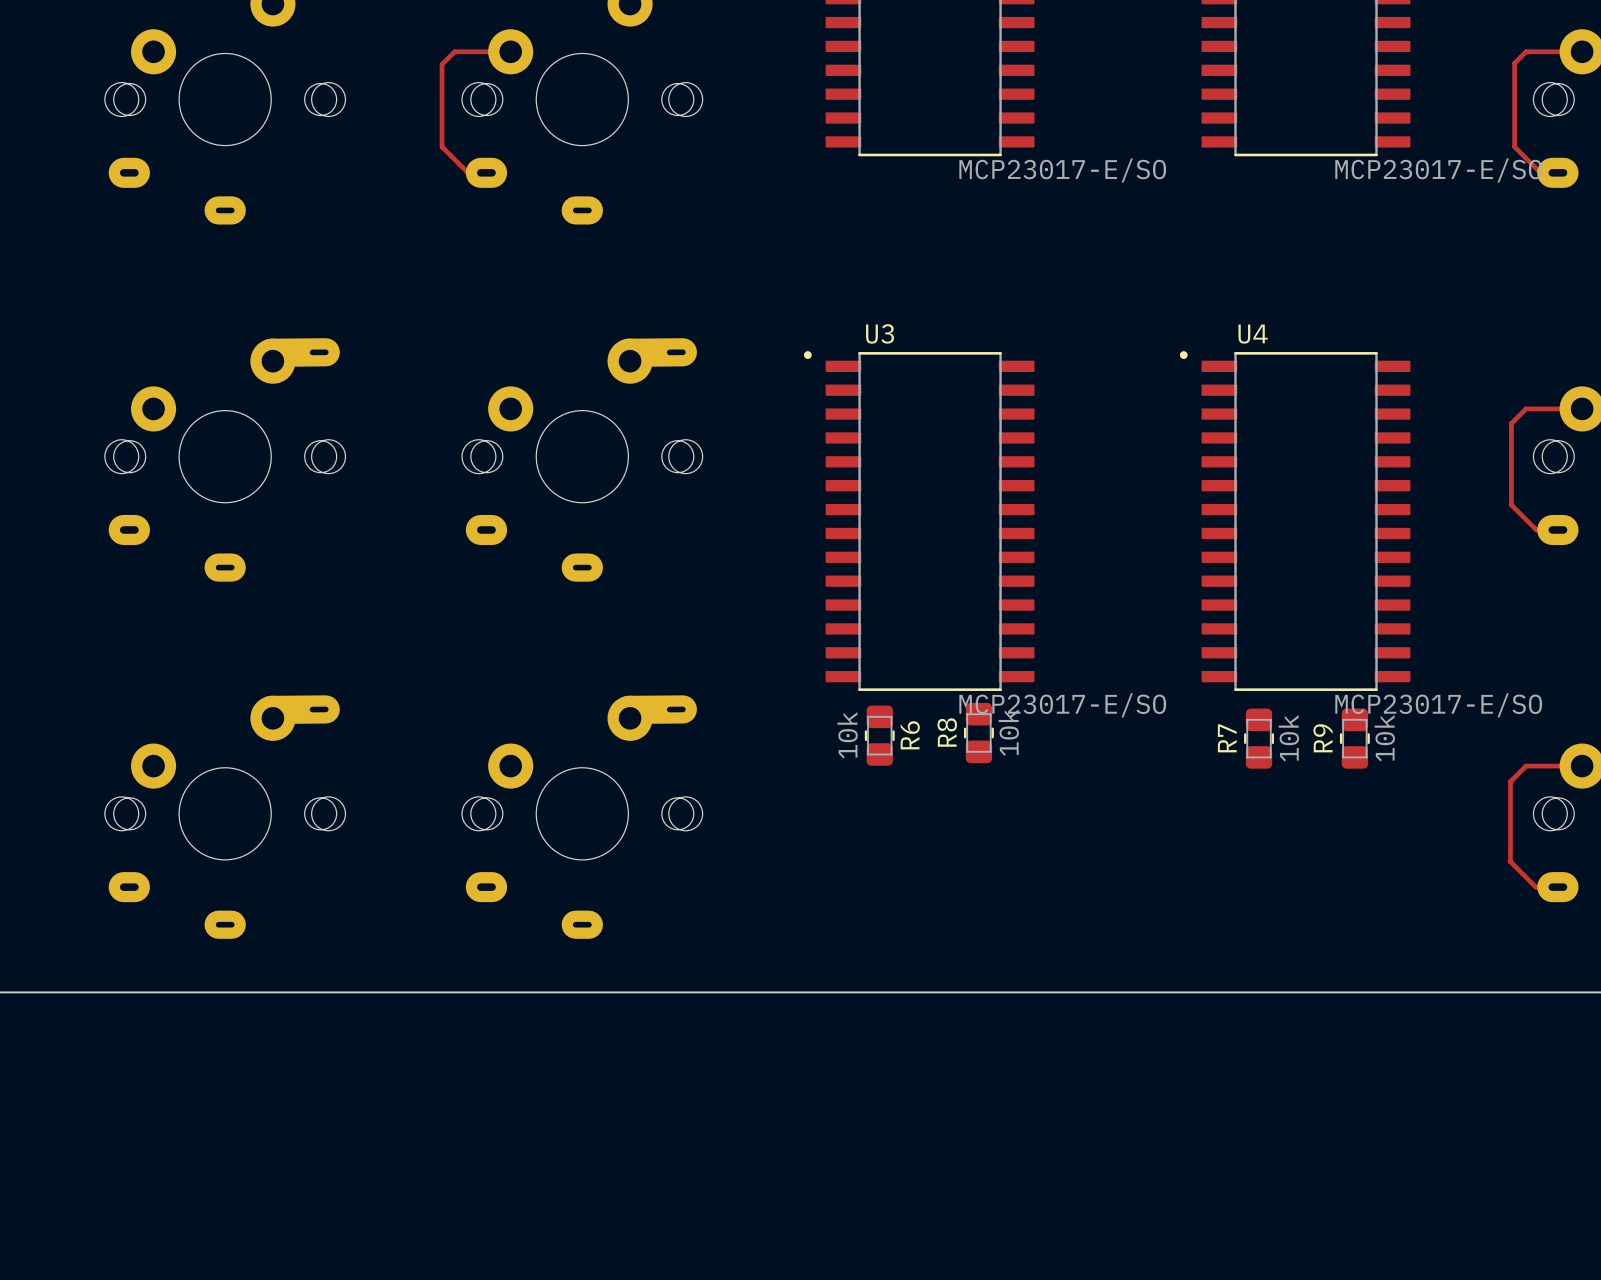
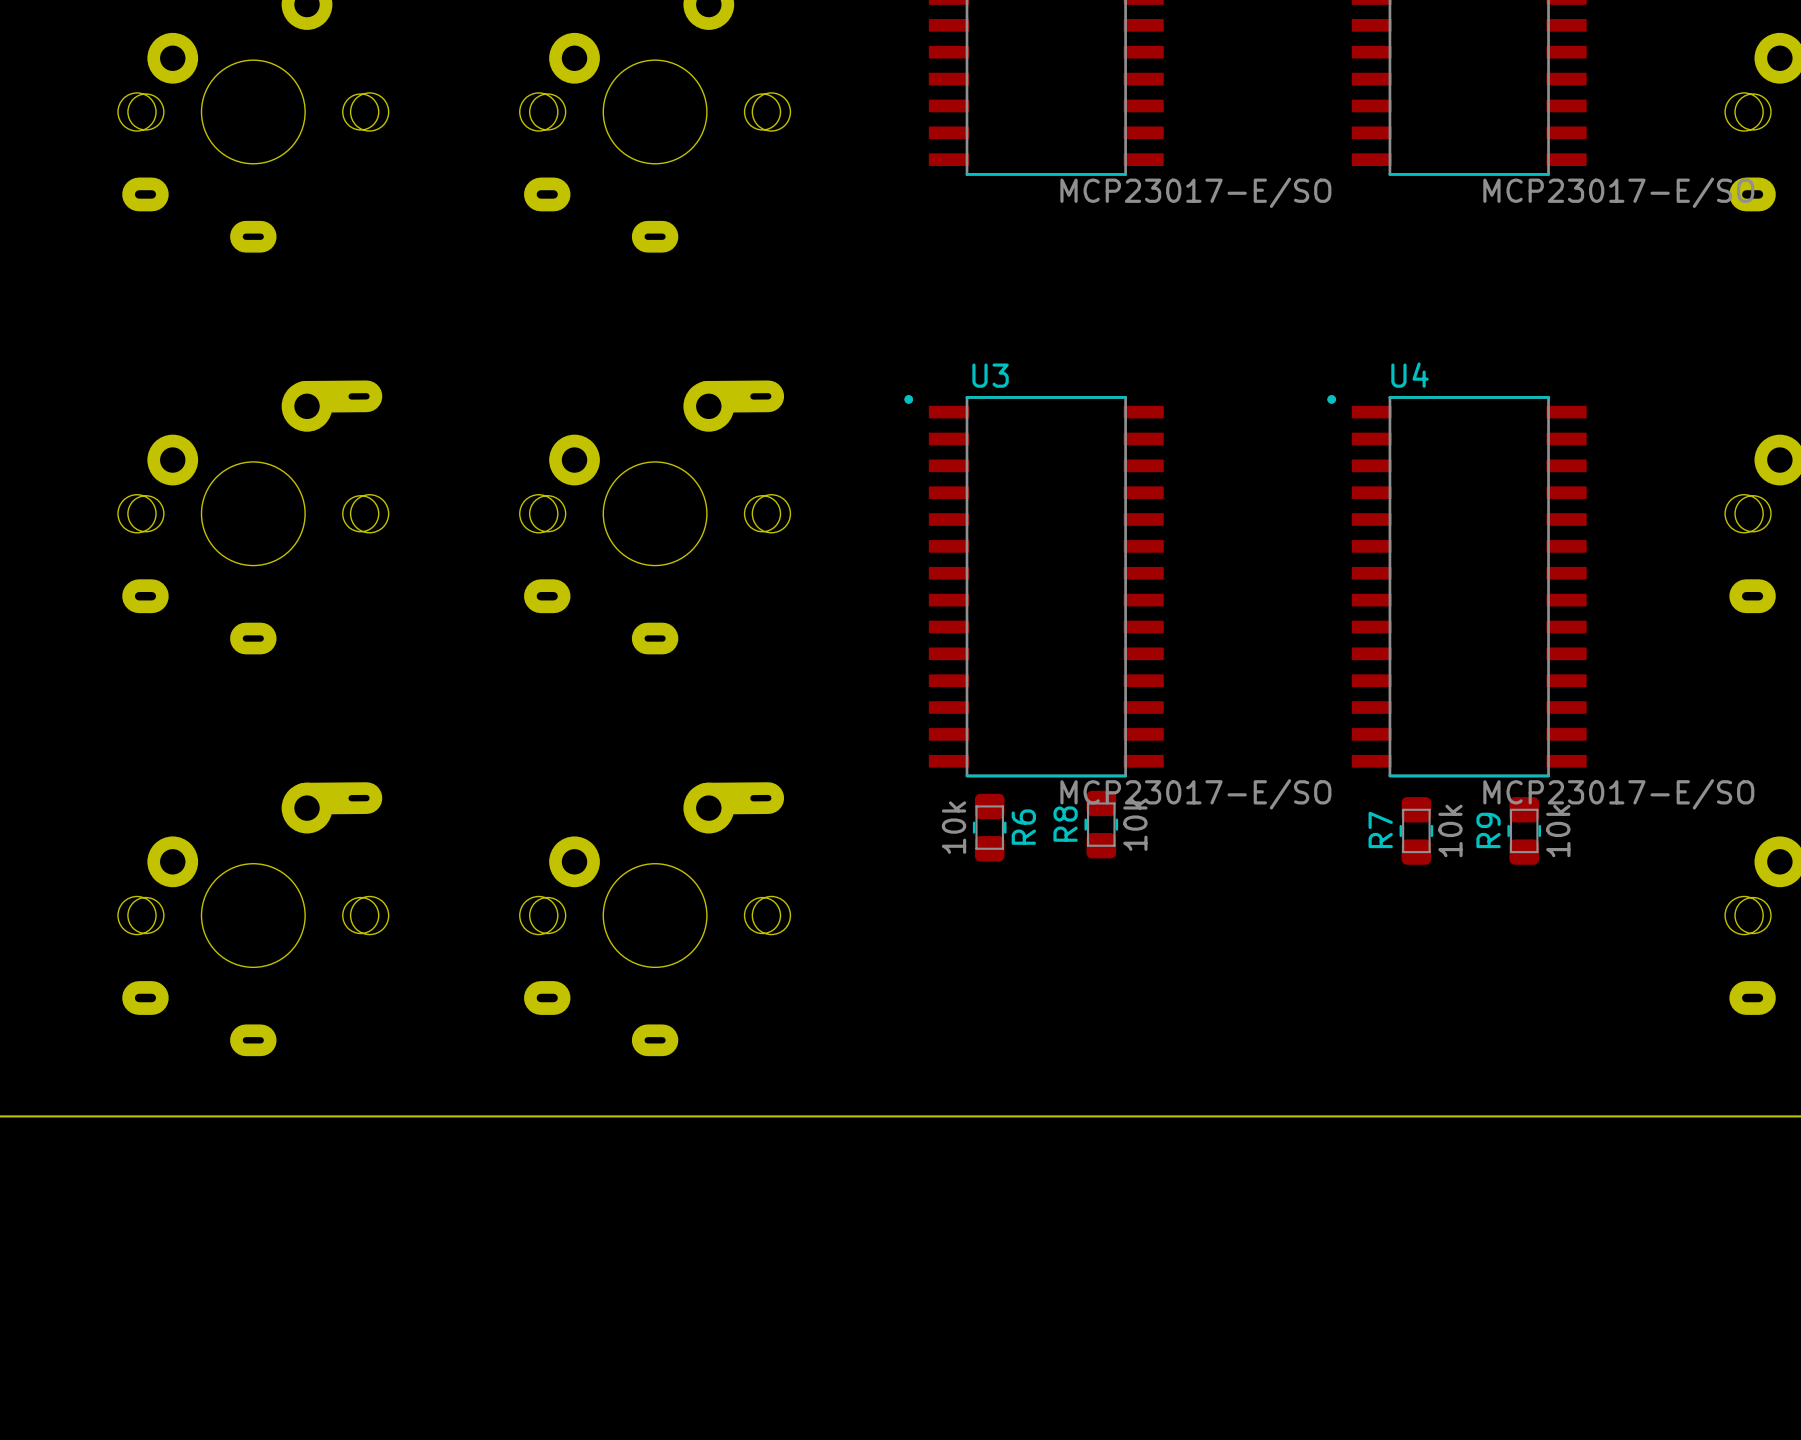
track: (510, 51) (454, 51) (442, 64) (442, 146) (467, 172) (486, 172) -> none
track: (1582, 51) (1526, 51) (1514, 63) (1514, 146) (1540, 172) (1557, 172) -> none
track: (1582, 408) (1526, 408) (1511, 423) (1511, 504) (1536, 529) (1557, 529) -> none
track: (1582, 766) (1526, 766) (1510, 781) (1510, 861) (1535, 887) (1557, 887) -> none

